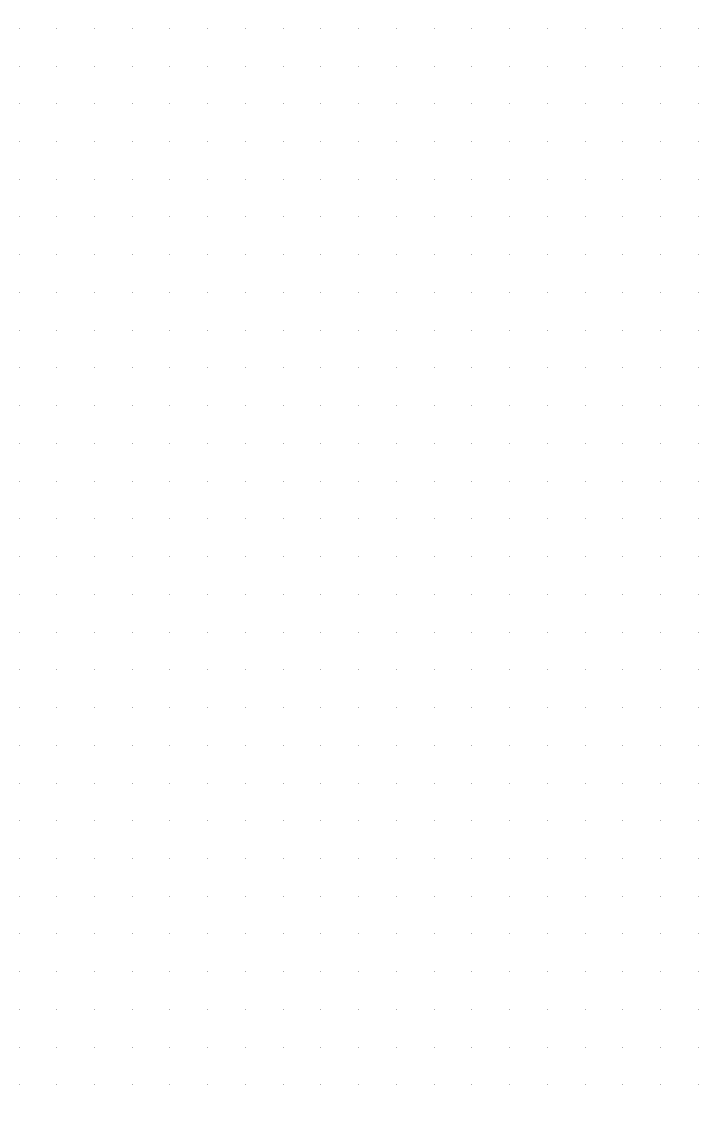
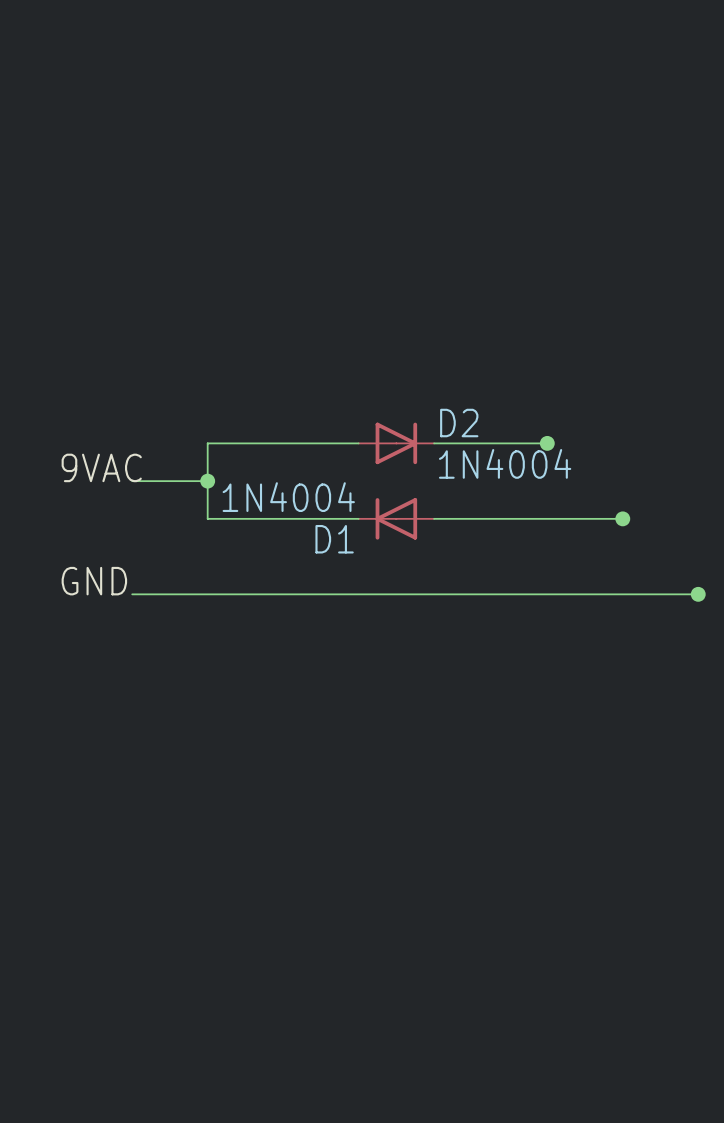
wire: none -> (358, 443) (207, 443) (207, 518) (358, 518)
D2: none -> 1N4004 (396, 443)
wire: none -> (434, 443) (547, 443)
junction: none -> (547, 443)
label: none -> 9VAC (101, 467)
wire: none -> (132, 481) (207, 481)
junction: none -> (207, 481)
D1: none -> 1N4004 (396, 518)
wire: none -> (434, 518) (622, 518)
junction: none -> (622, 518)
label: none -> GND (94, 581)
wire: none -> (132, 594) (698, 594)
junction: none -> (698, 594)

